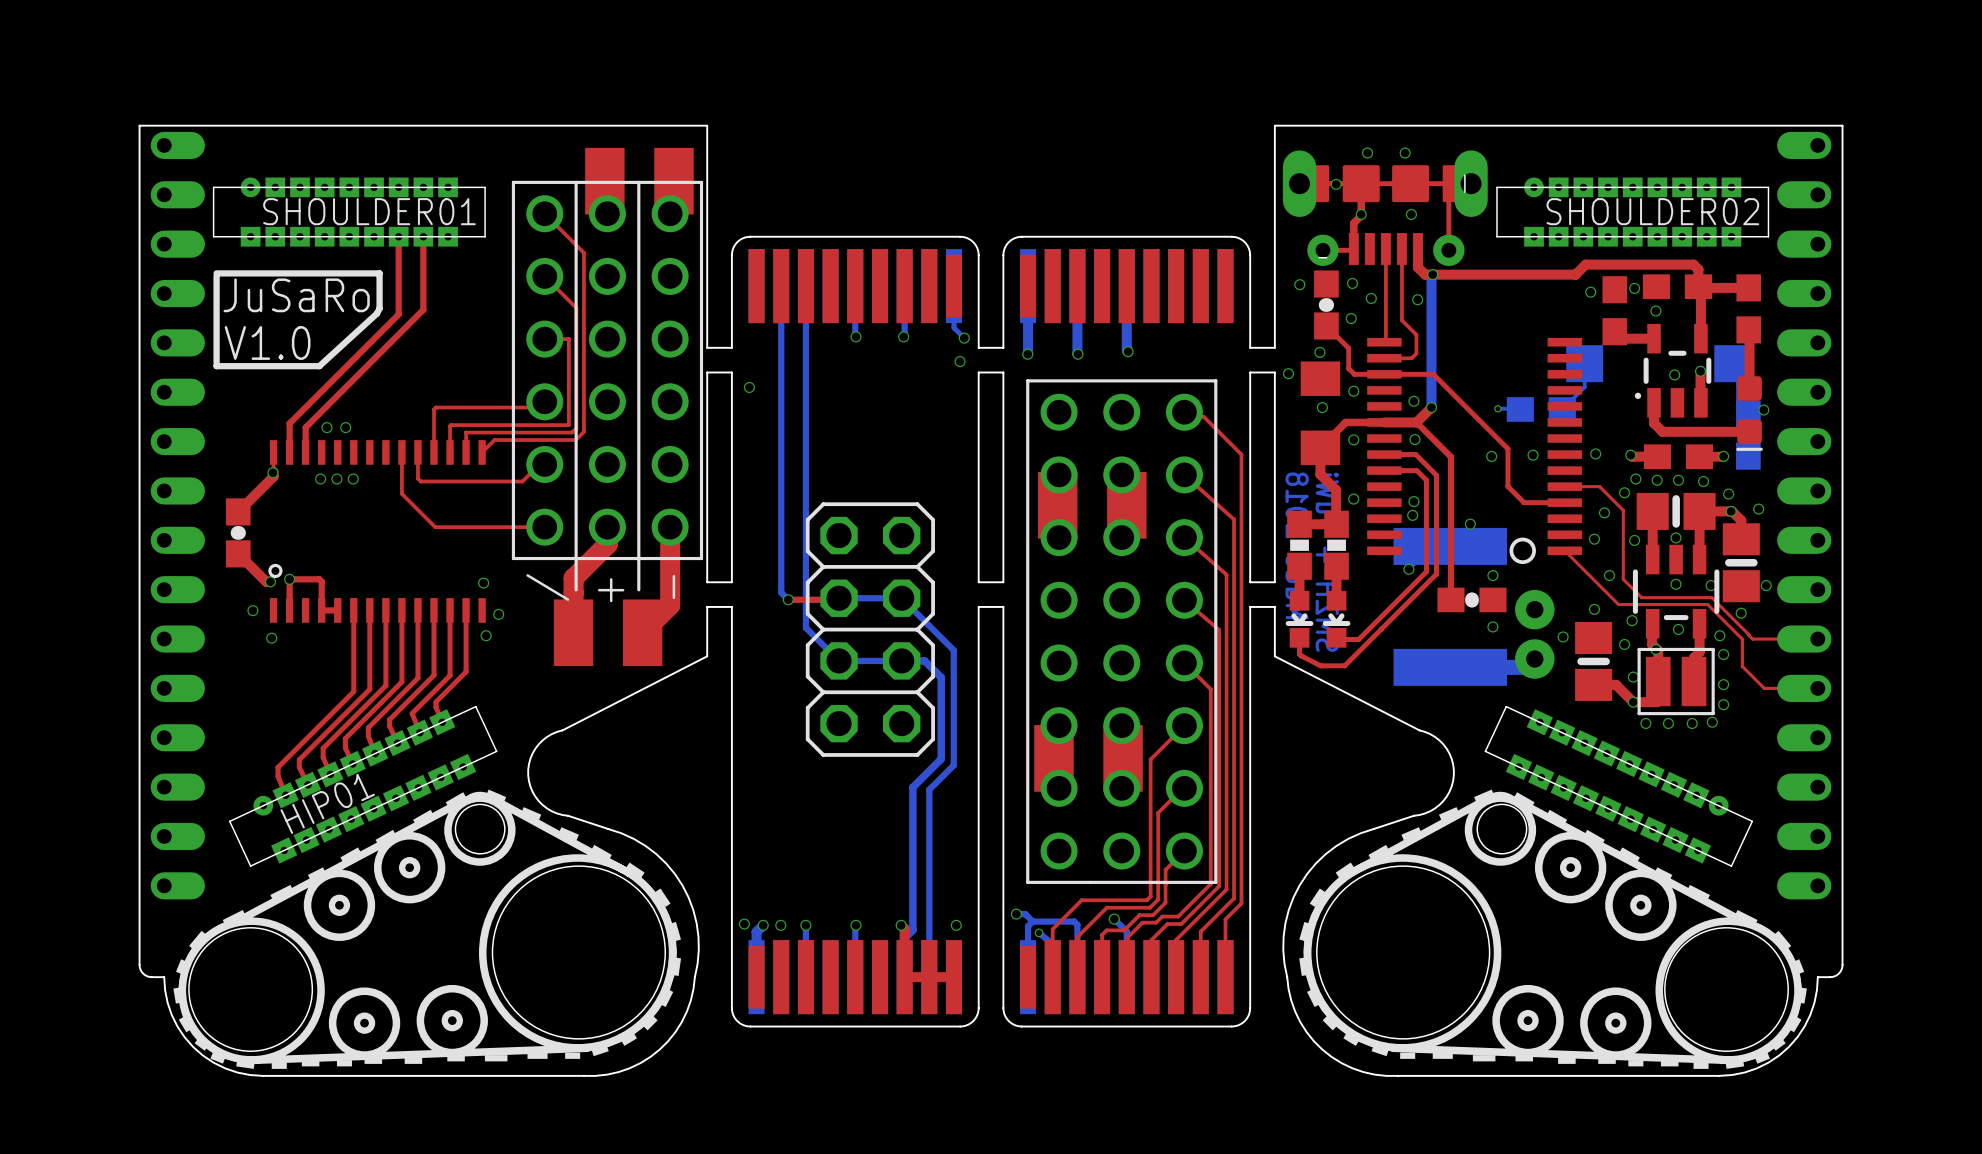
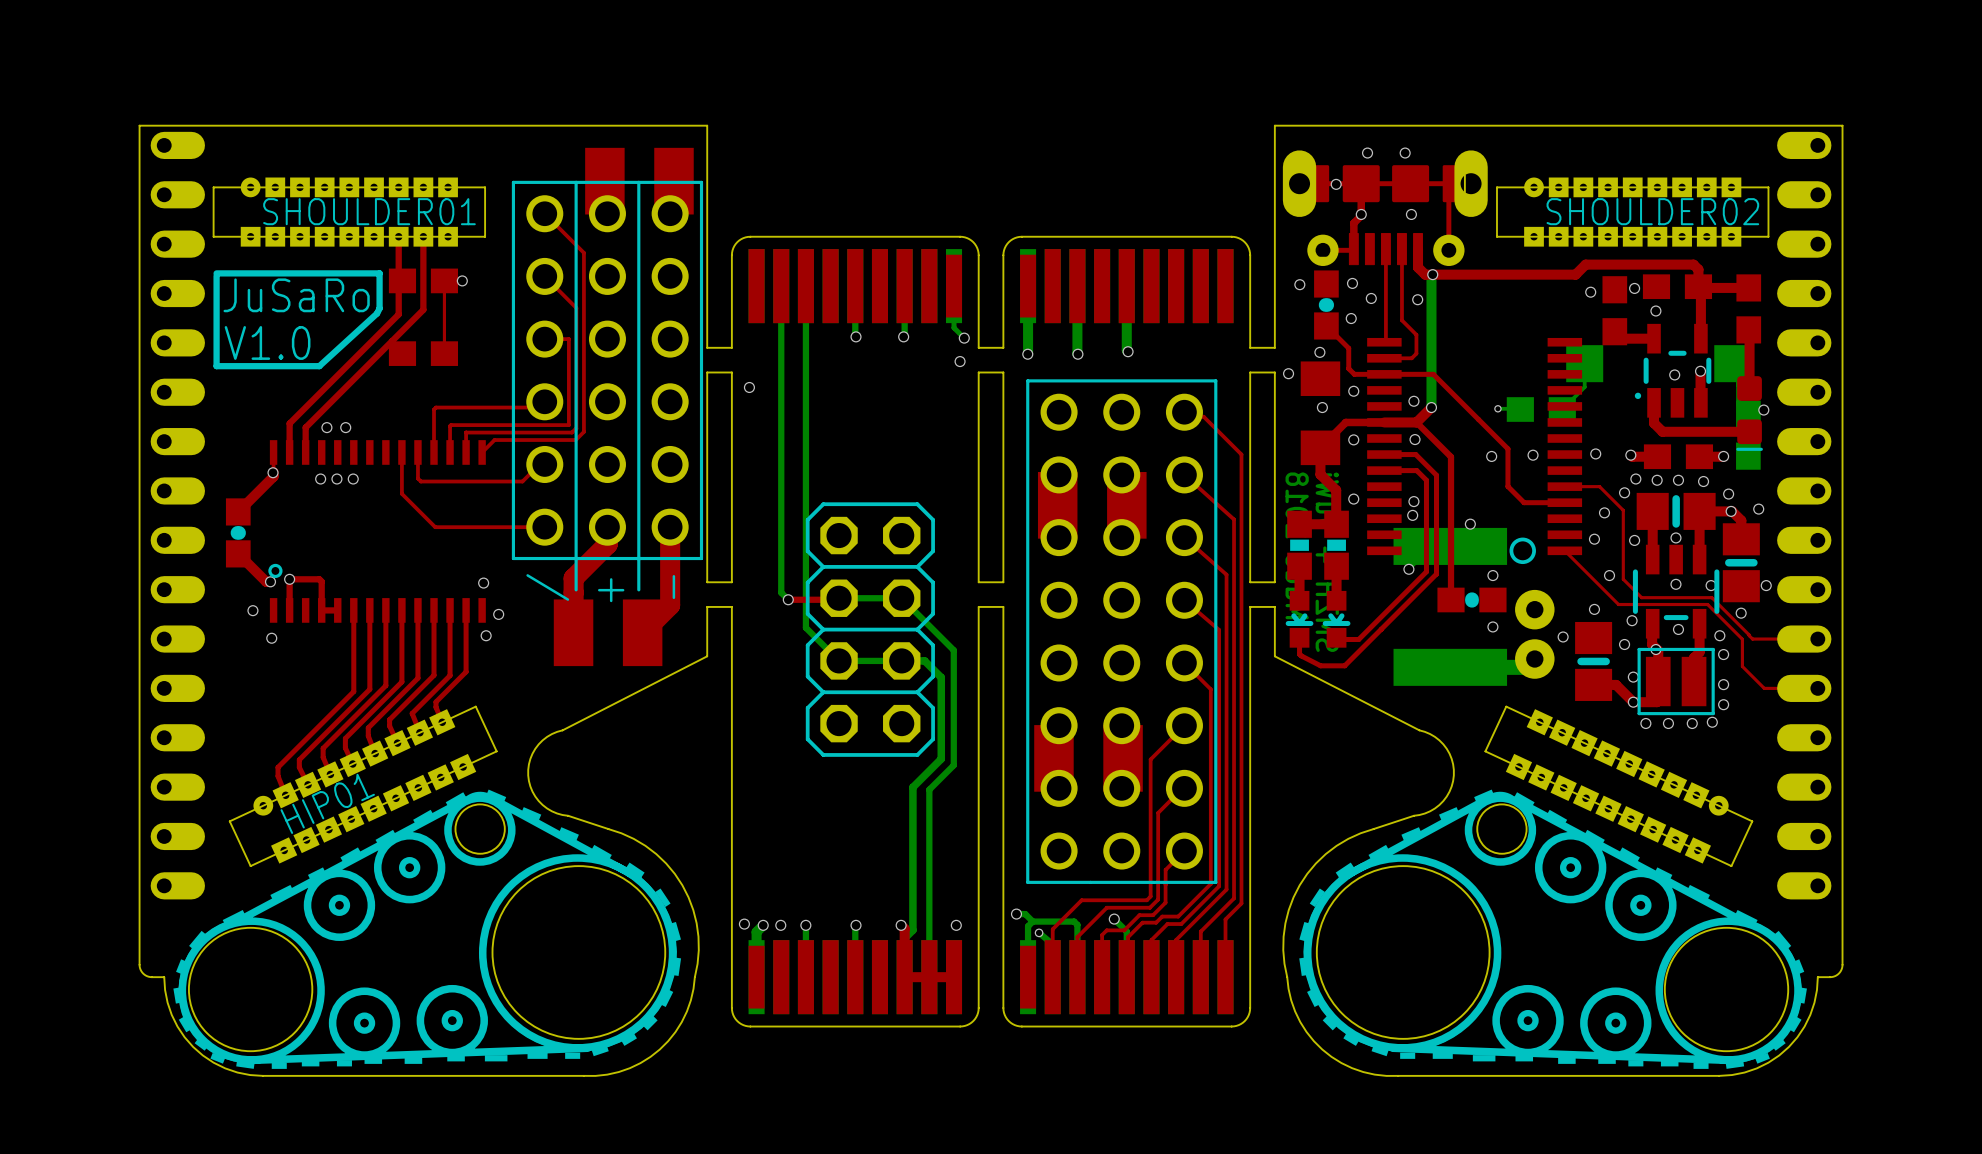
part: none -> (423, 280)
top track: none -> (462, 280) (444, 280) (444, 353)
via: none -> (462, 280)
part: none -> (423, 353)

